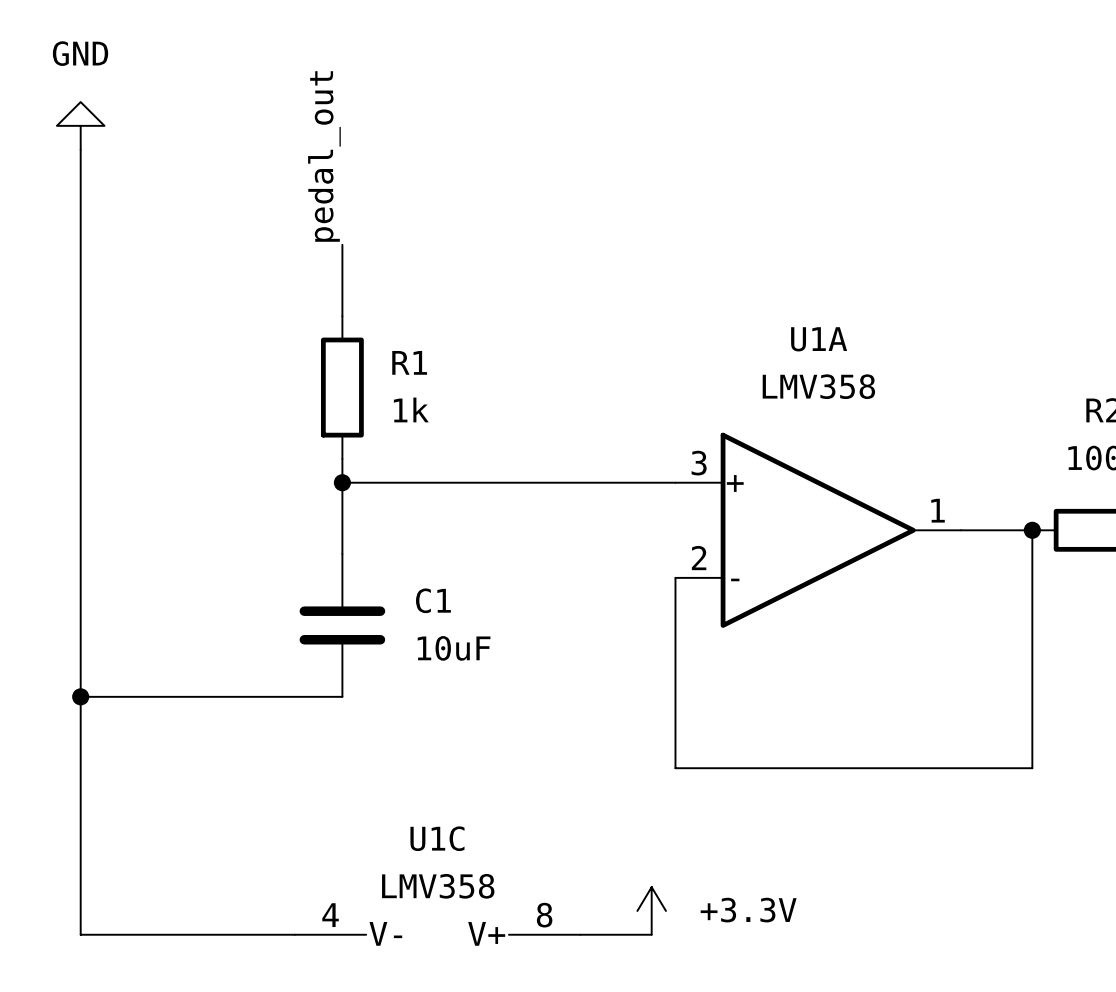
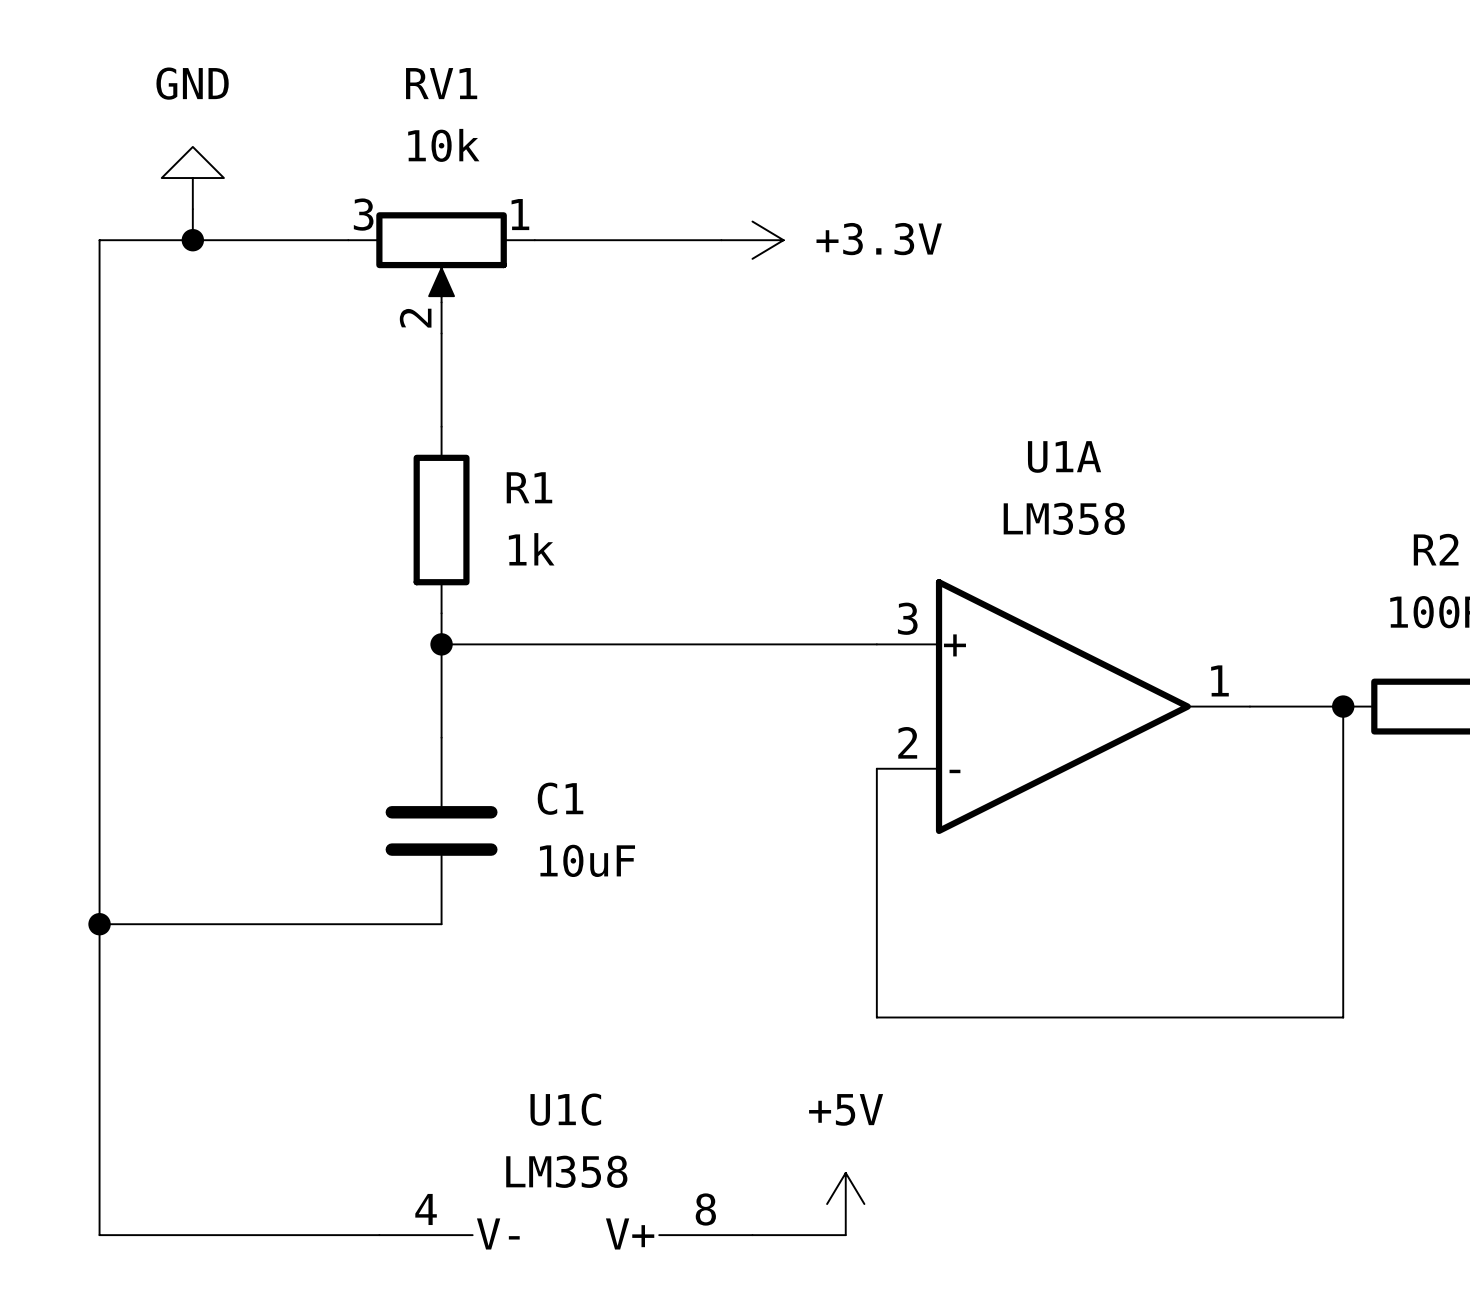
power symbol position: GND (80, 125) -> GND (192, 178)
wire: (80, 149) (80, 173) -> (348, 240) (99, 240)
wire: none -> (192, 209) (192, 240)
label: pedal_out (324, 156) -> none
junction: none -> (192, 240)
wire: none -> (534, 240) (721, 240)
power symbol: none -> +3.3V (752, 240)
RV1: none -> 10k (441, 272)
U1A value: LMV358 (818, 386) -> LM358 (1064, 518)
U1C value: LMV358 (438, 886) -> LM358 (566, 1171)
power symbol: +3.3V (651, 910) -> +5V (845, 1204)

